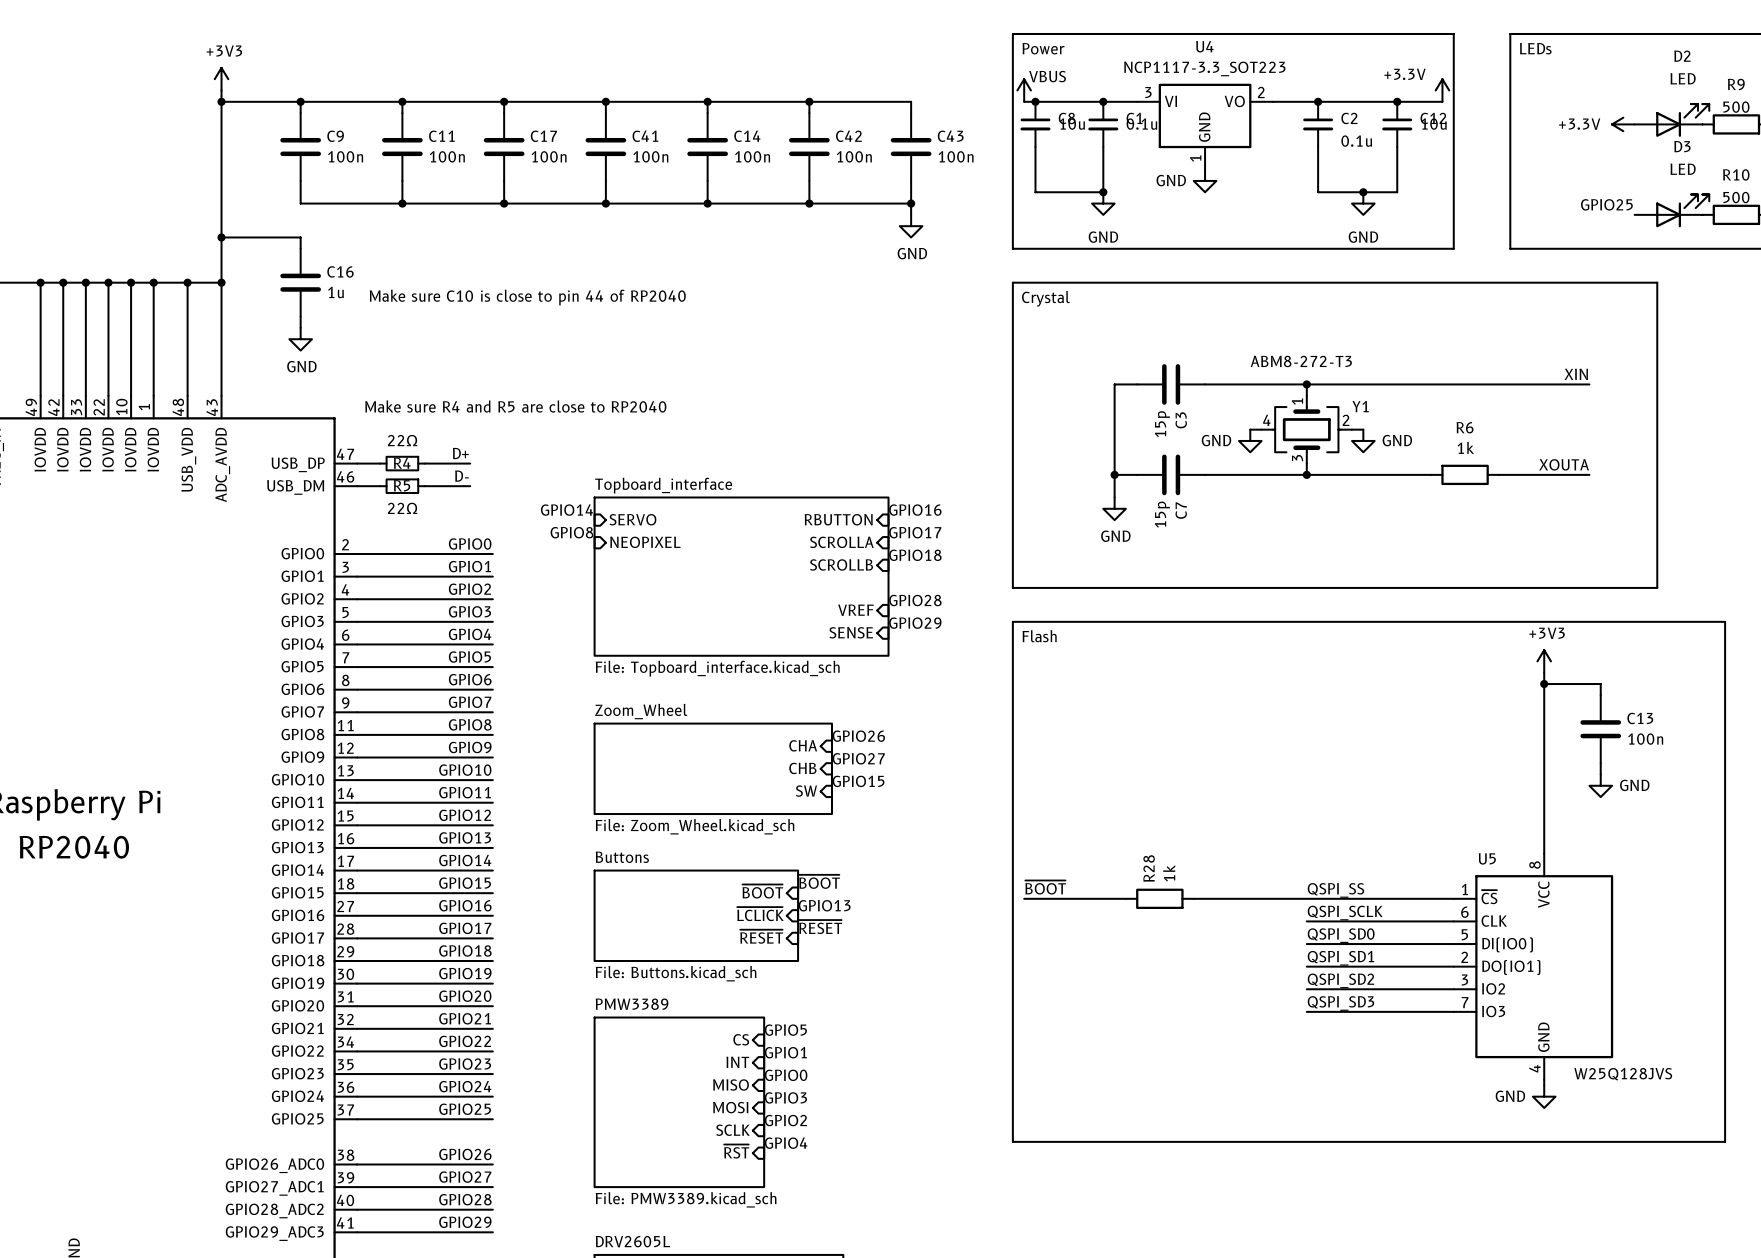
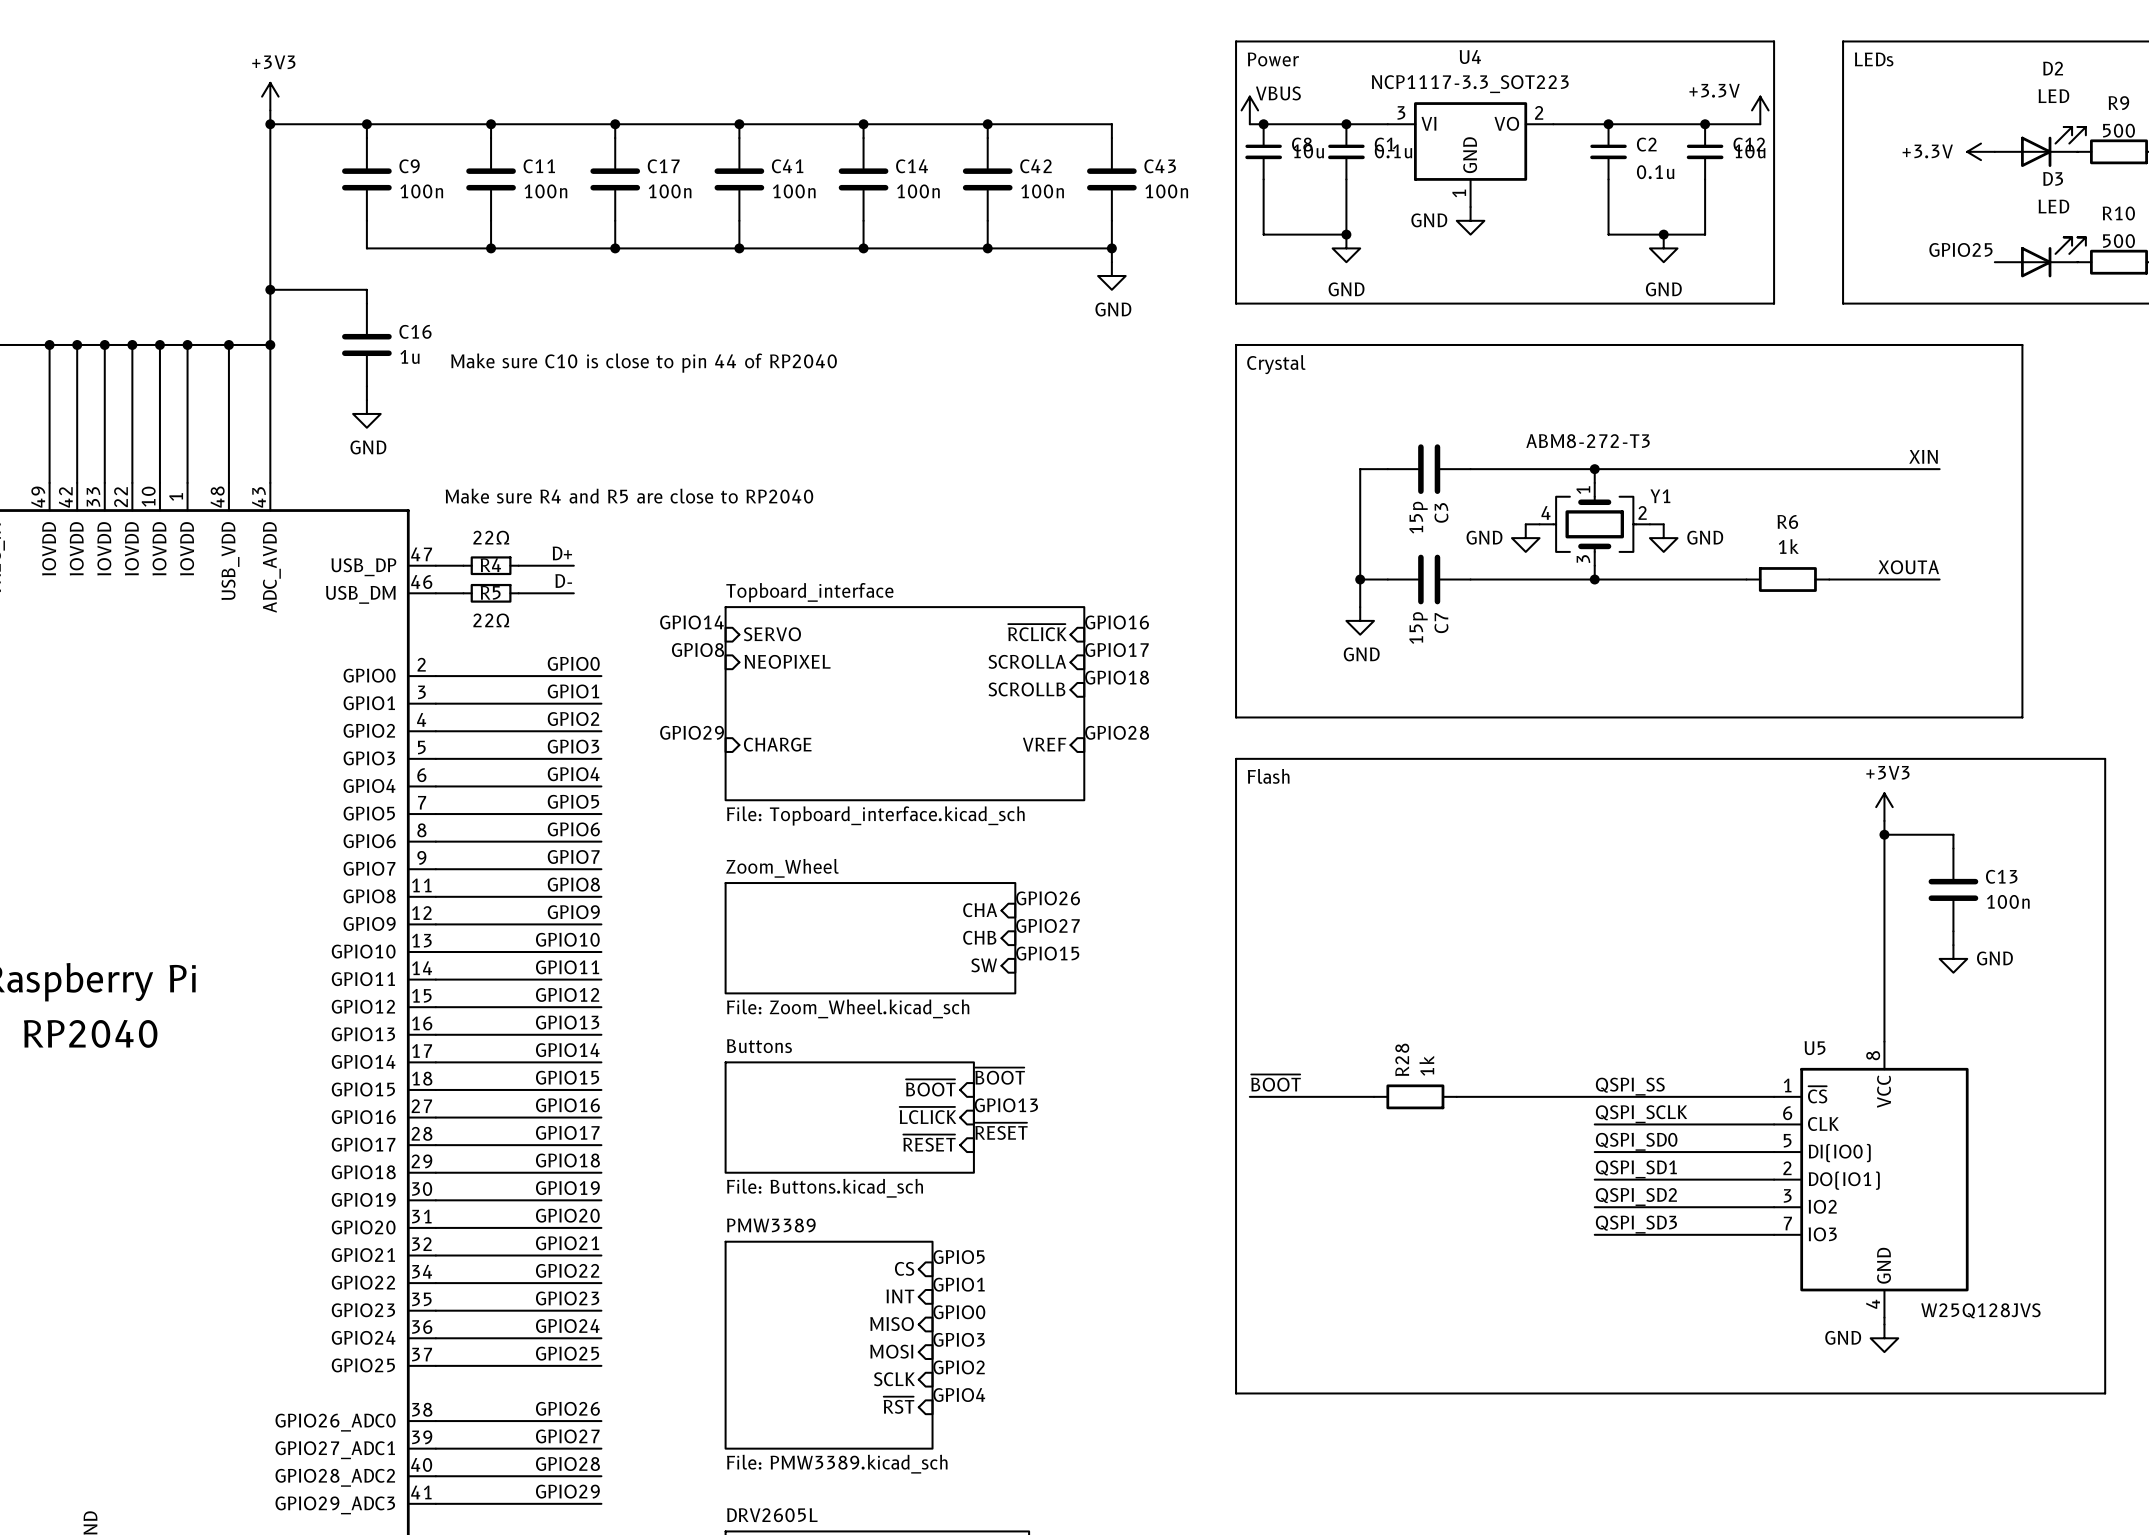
sheet pin: RBUTTON (838, 519) -> ~{RCLICK} (1037, 632)
label: none -> GPIO29 (692, 732)
sheet pin: none -> CHARGE (777, 744)
label: GPIO29 (915, 623) -> none
sheet pin: SENSE (851, 632) -> none

